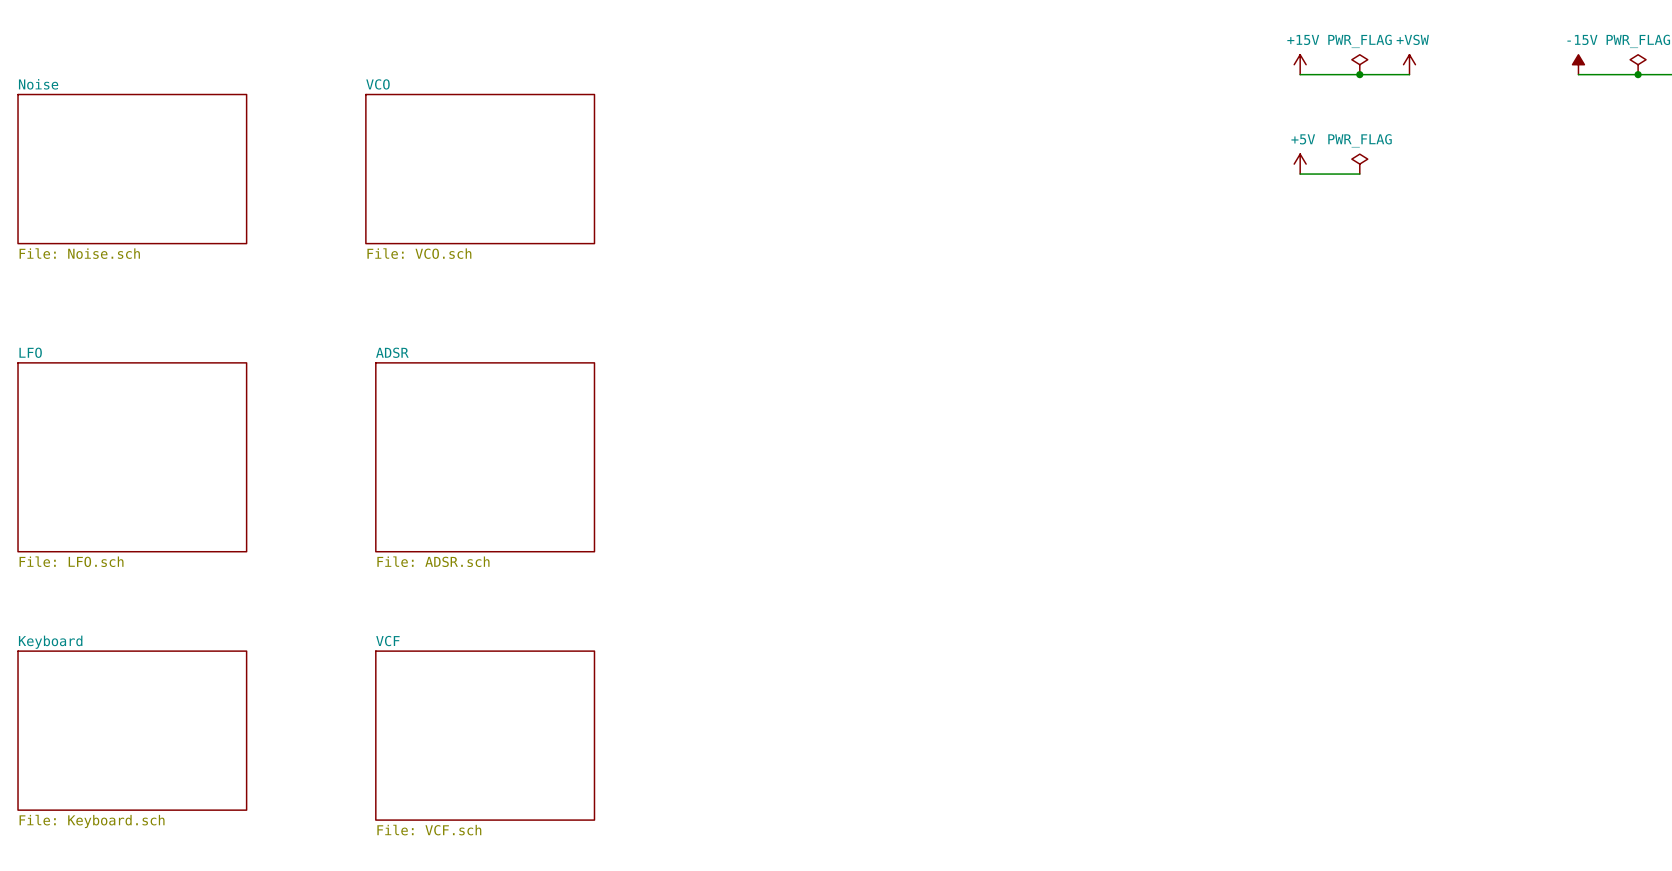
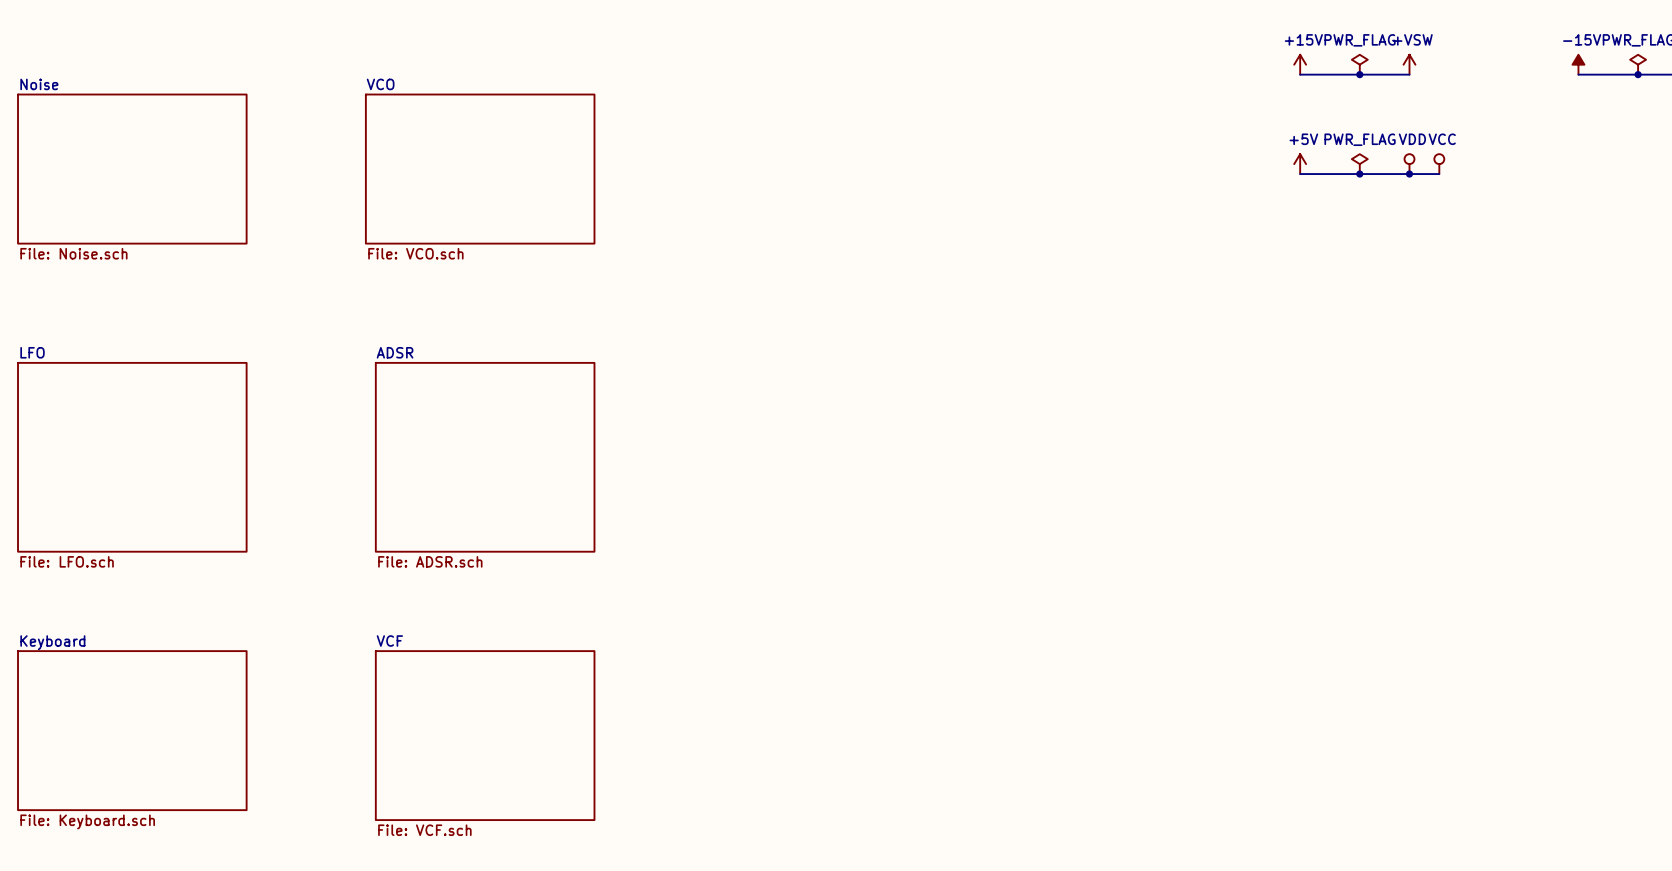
power symbol: none -> VDD (1409, 164)
power symbol: none -> VCC (1439, 164)
wire: none -> (1359, 174) (1439, 174)
junction: none -> (1359, 174)
junction: none -> (1409, 174)

